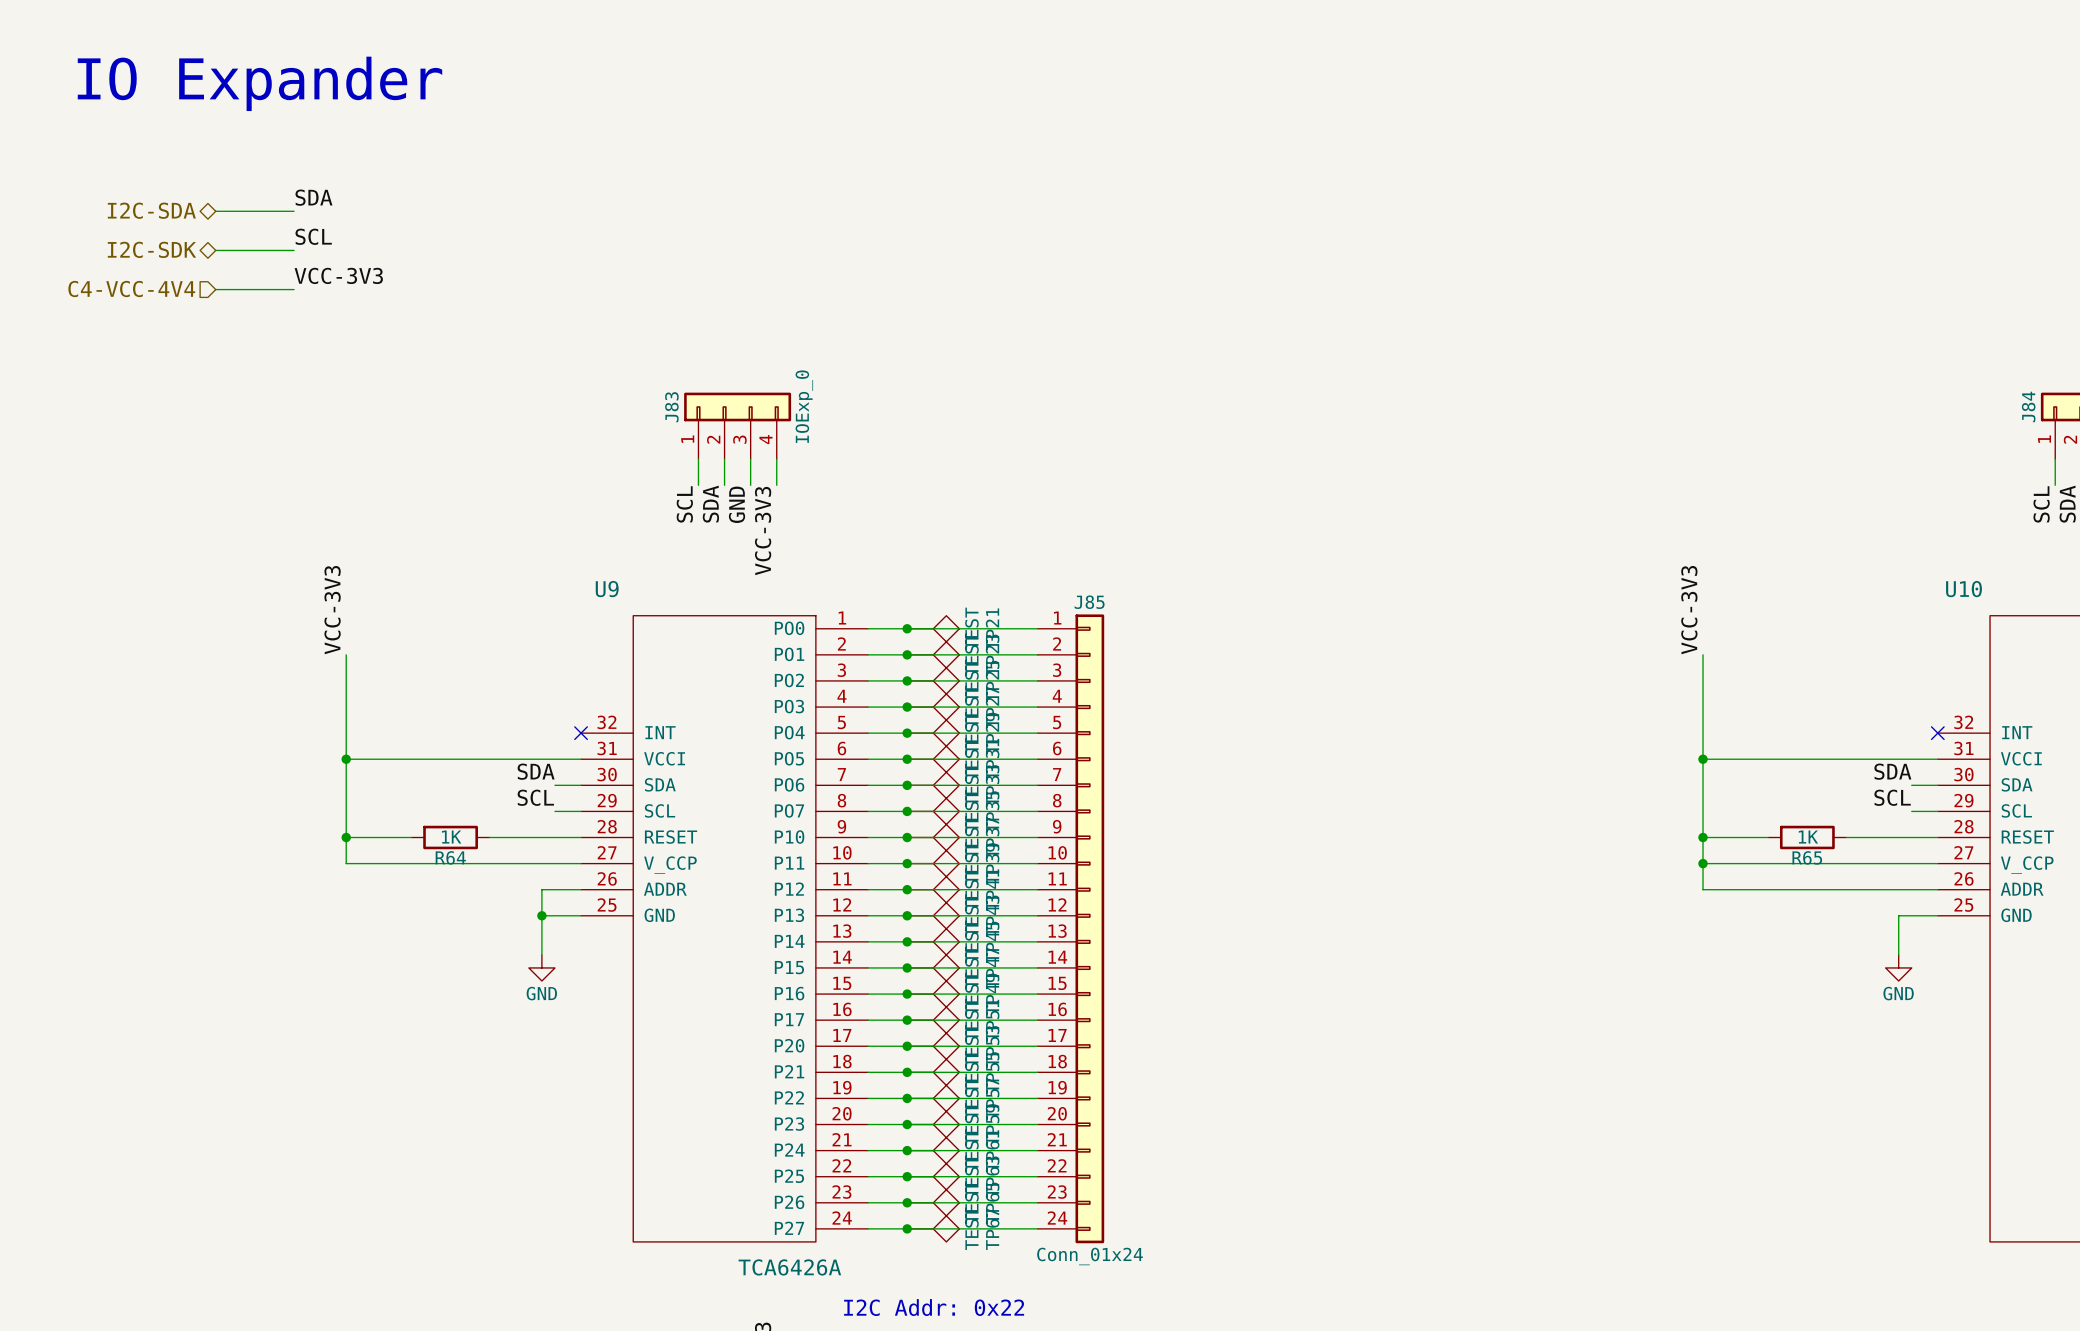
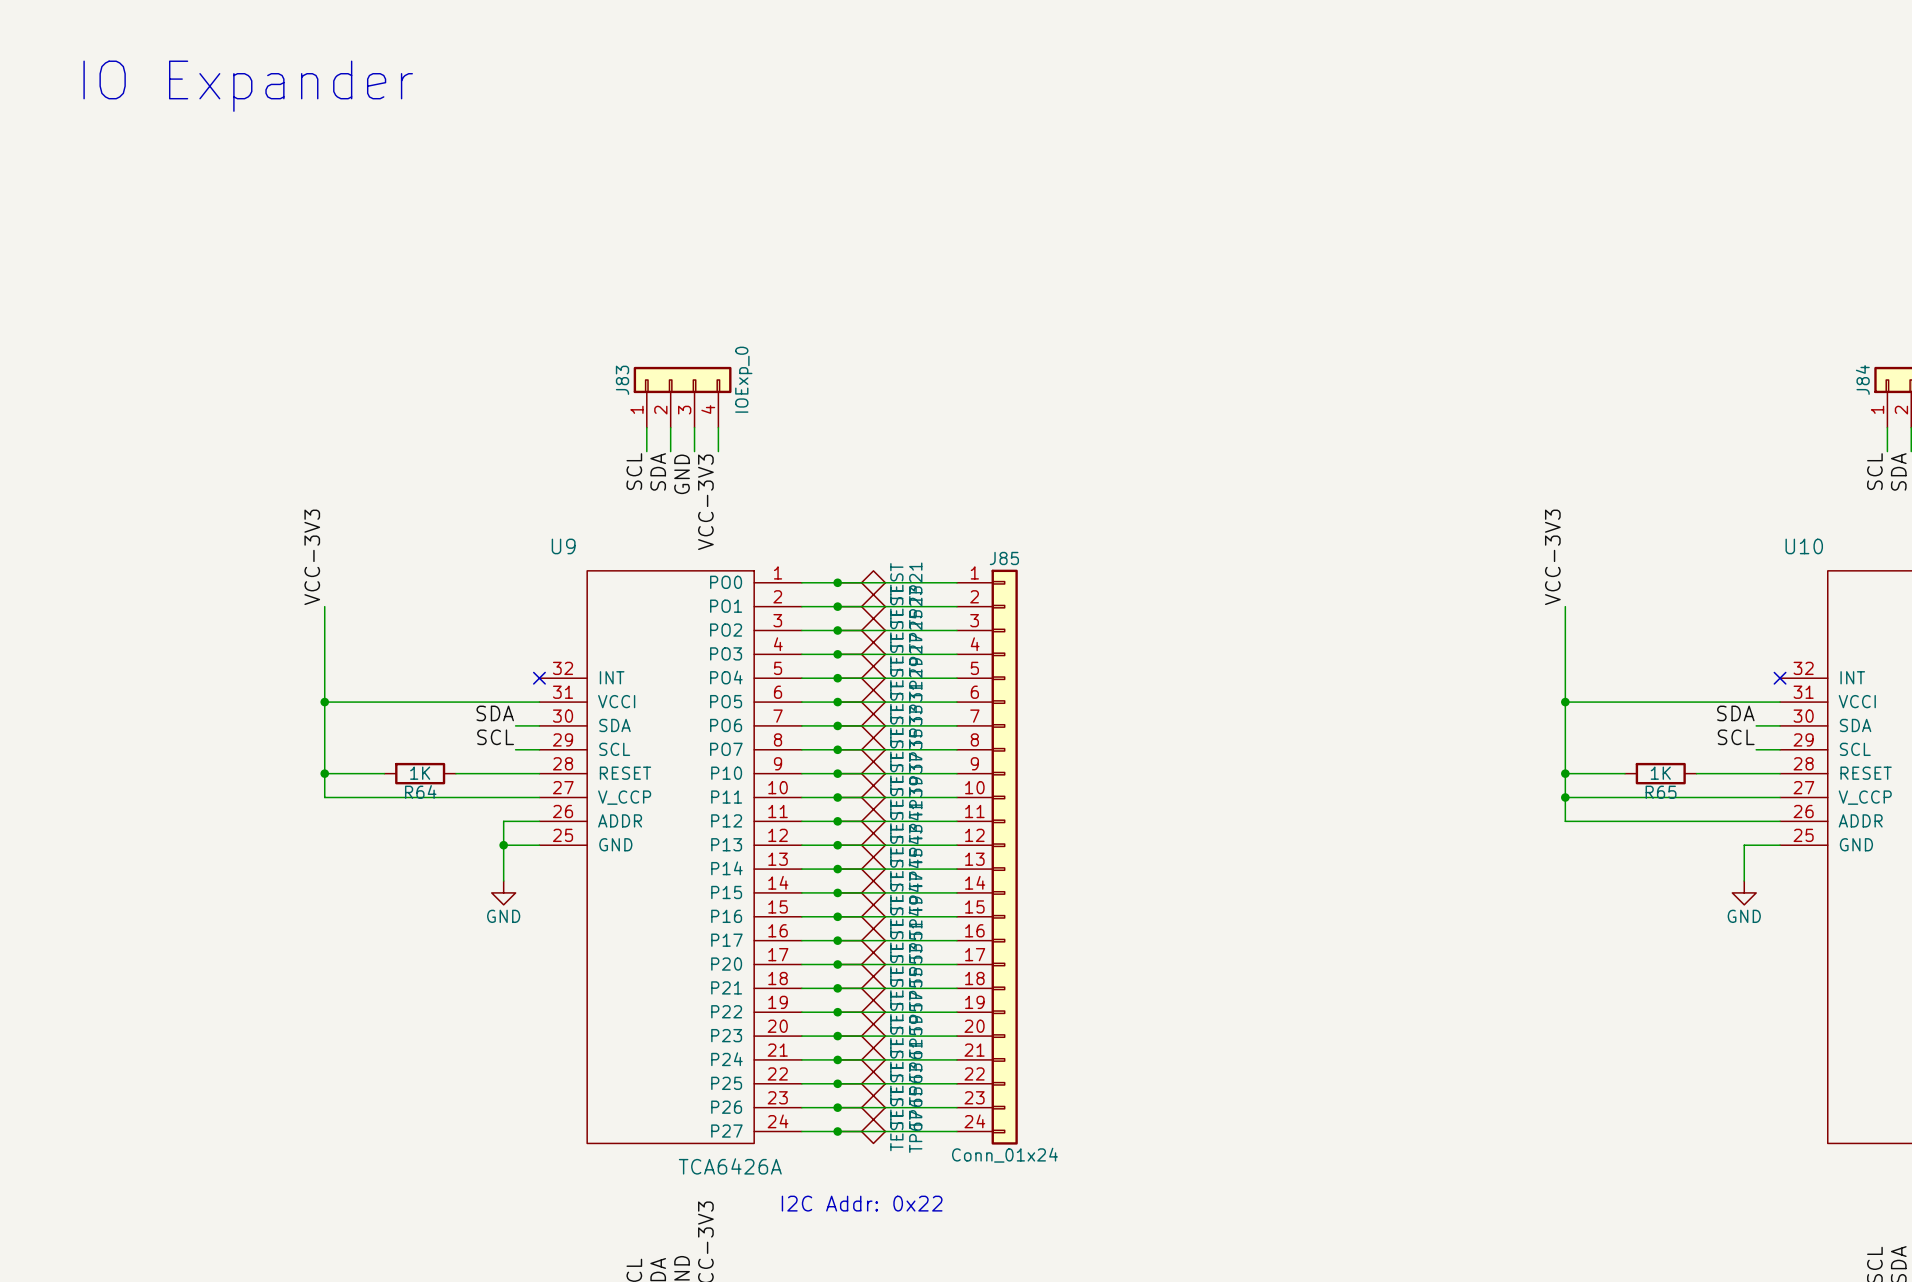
label: SDA (313, 197) -> none
hierarchical label: I2C-SDA (151, 210) -> none
wire: (215, 211) (294, 211) -> none
label: SCL (313, 236) -> none
hierarchical label: I2C-SDK (151, 249) -> none
wire: (215, 250) (294, 250) -> none
label: VCC-3V3 (338, 275) -> none
hierarchical label: C4-VCC-4V4 (131, 289) -> none
wire: (215, 289) (294, 289) -> none

